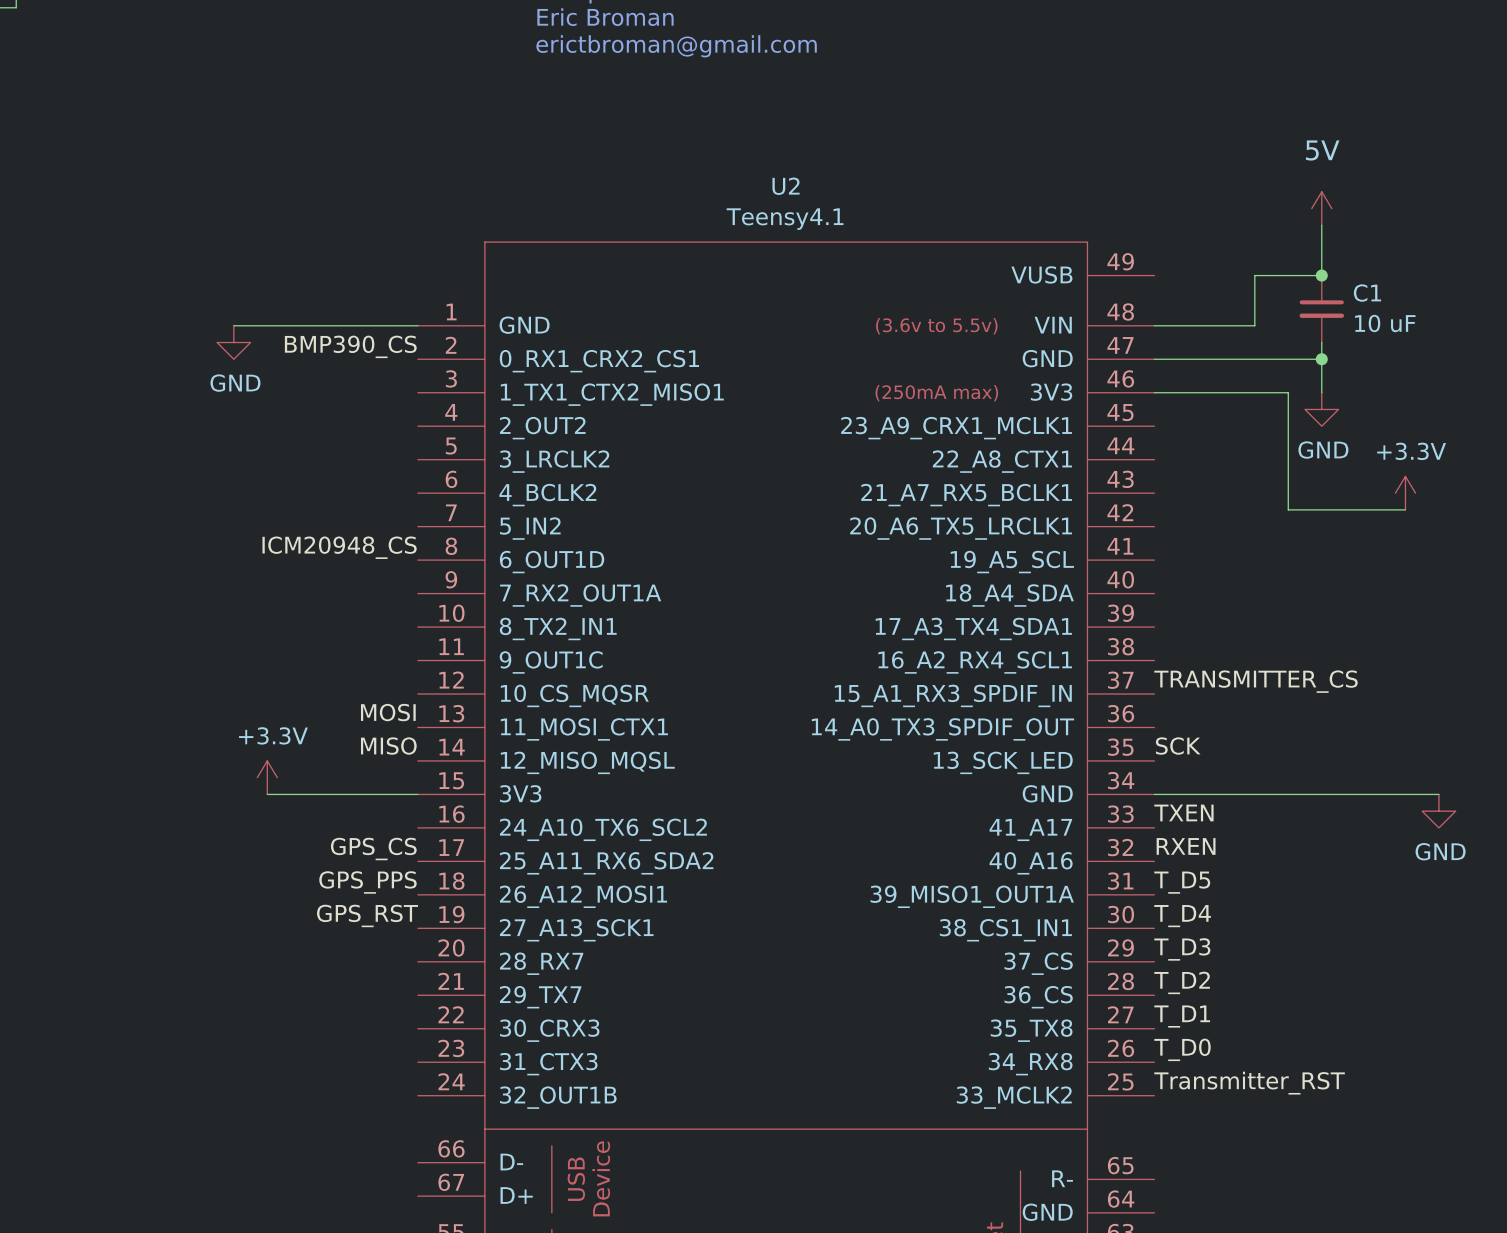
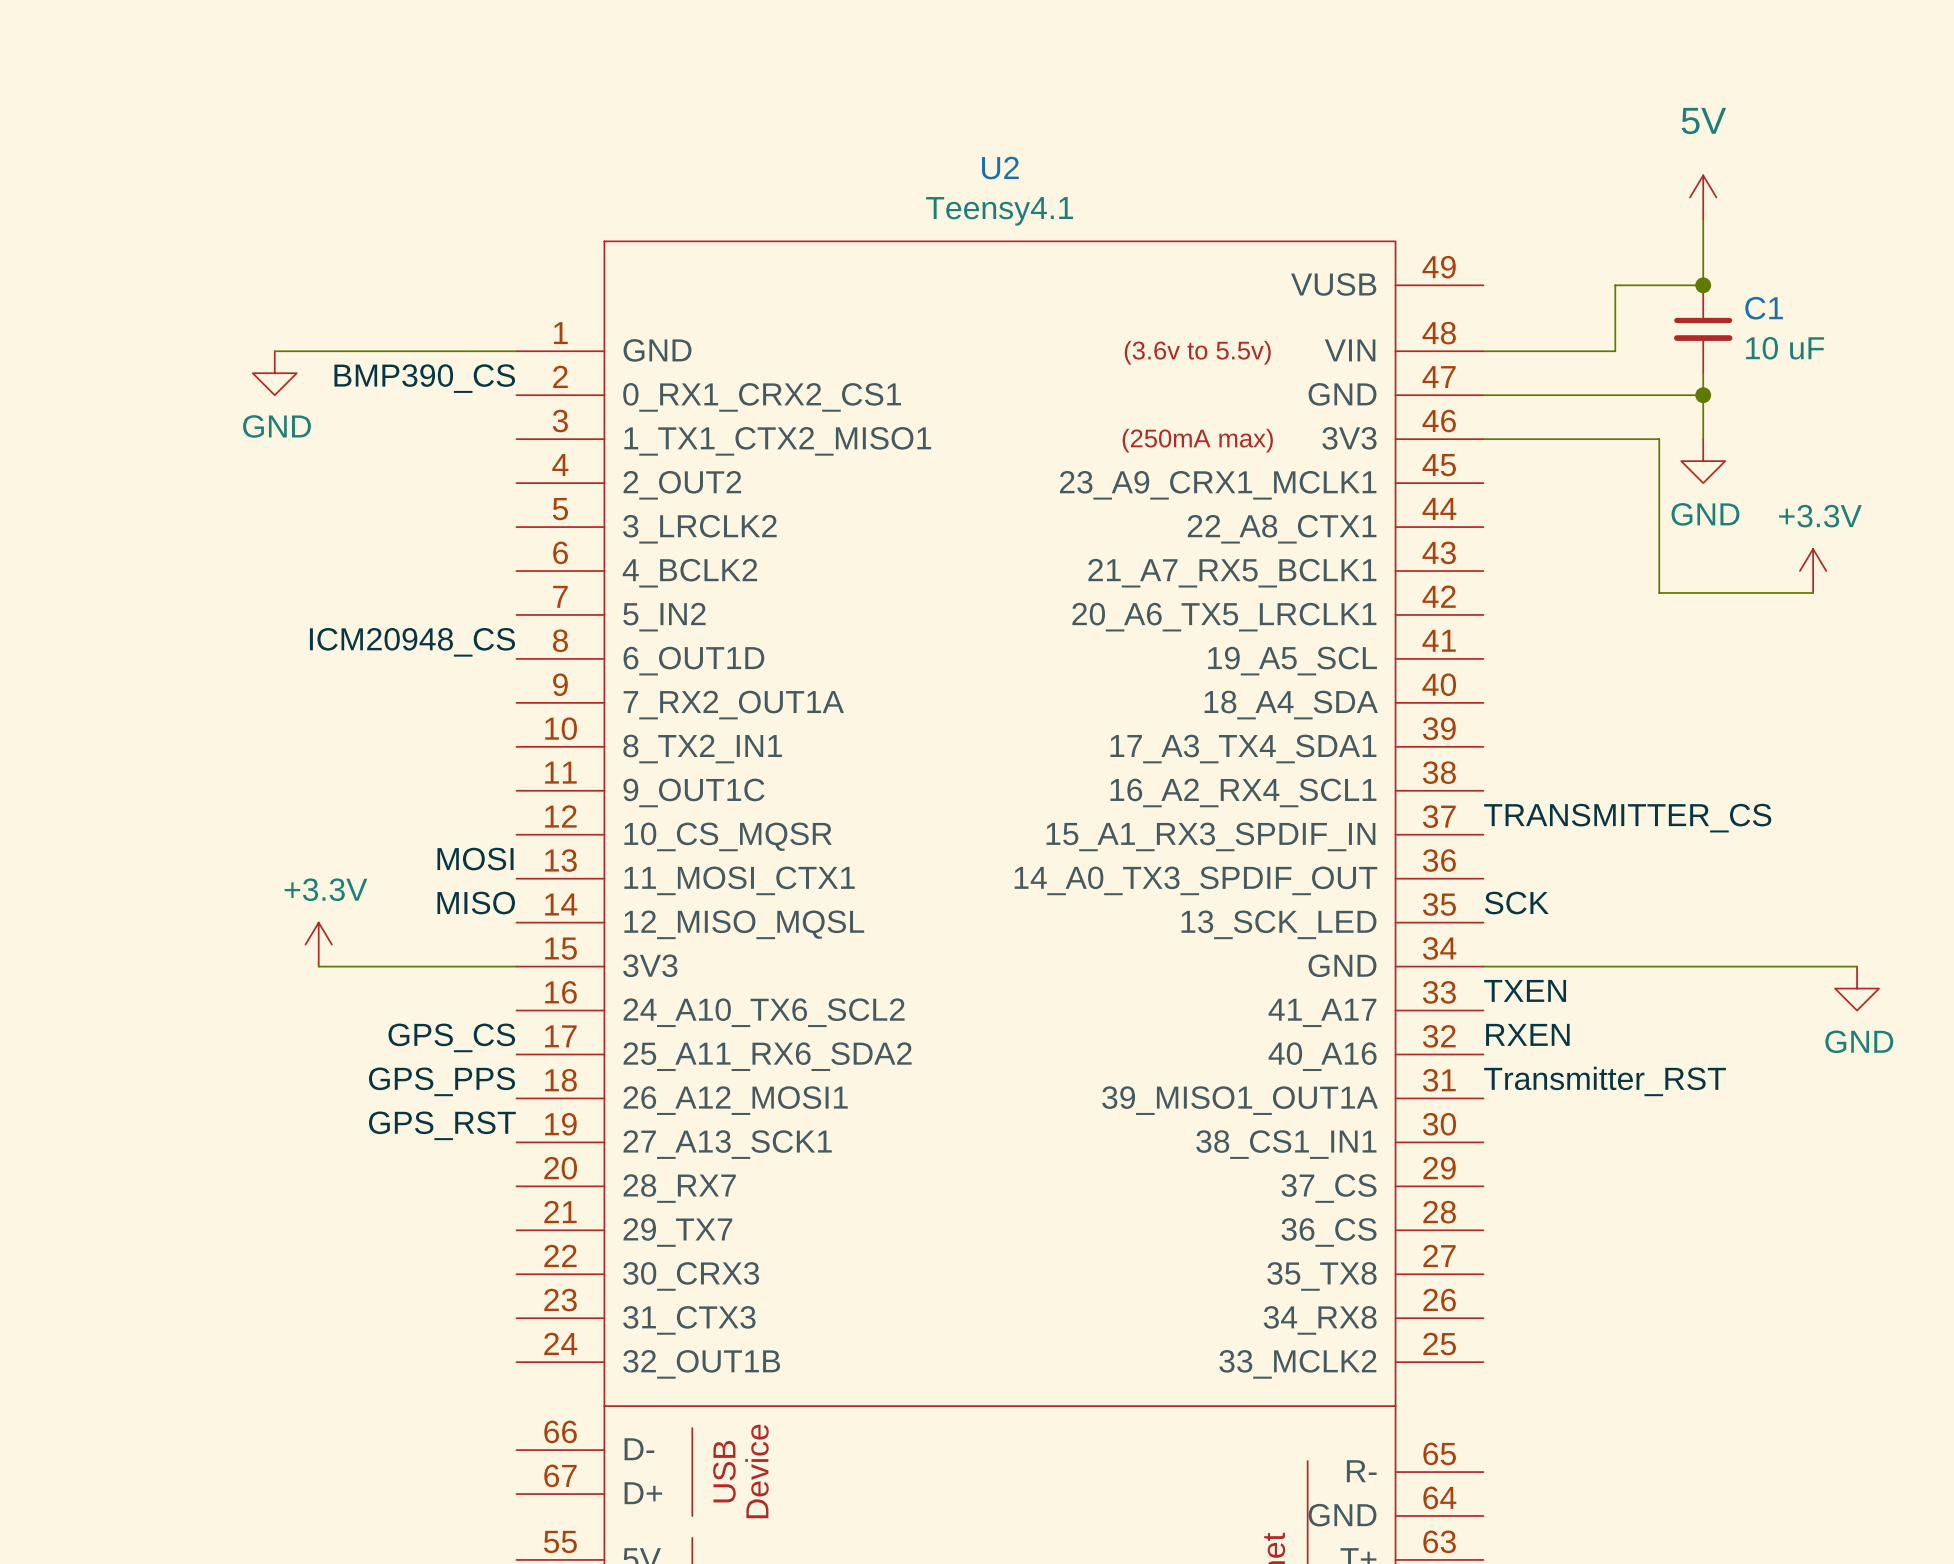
label: T_D5 (1182, 882) -> Transmitter_RST (1605, 1081)
label: T_D4 (1182, 916) -> none
label: T_D3 (1182, 949) -> none
label: T_D2 (1182, 982) -> none
label: T_D1 (1182, 1016) -> none
label: T_D0 (1182, 1049) -> none
label: Transmitter_RST (1249, 1083) -> none

